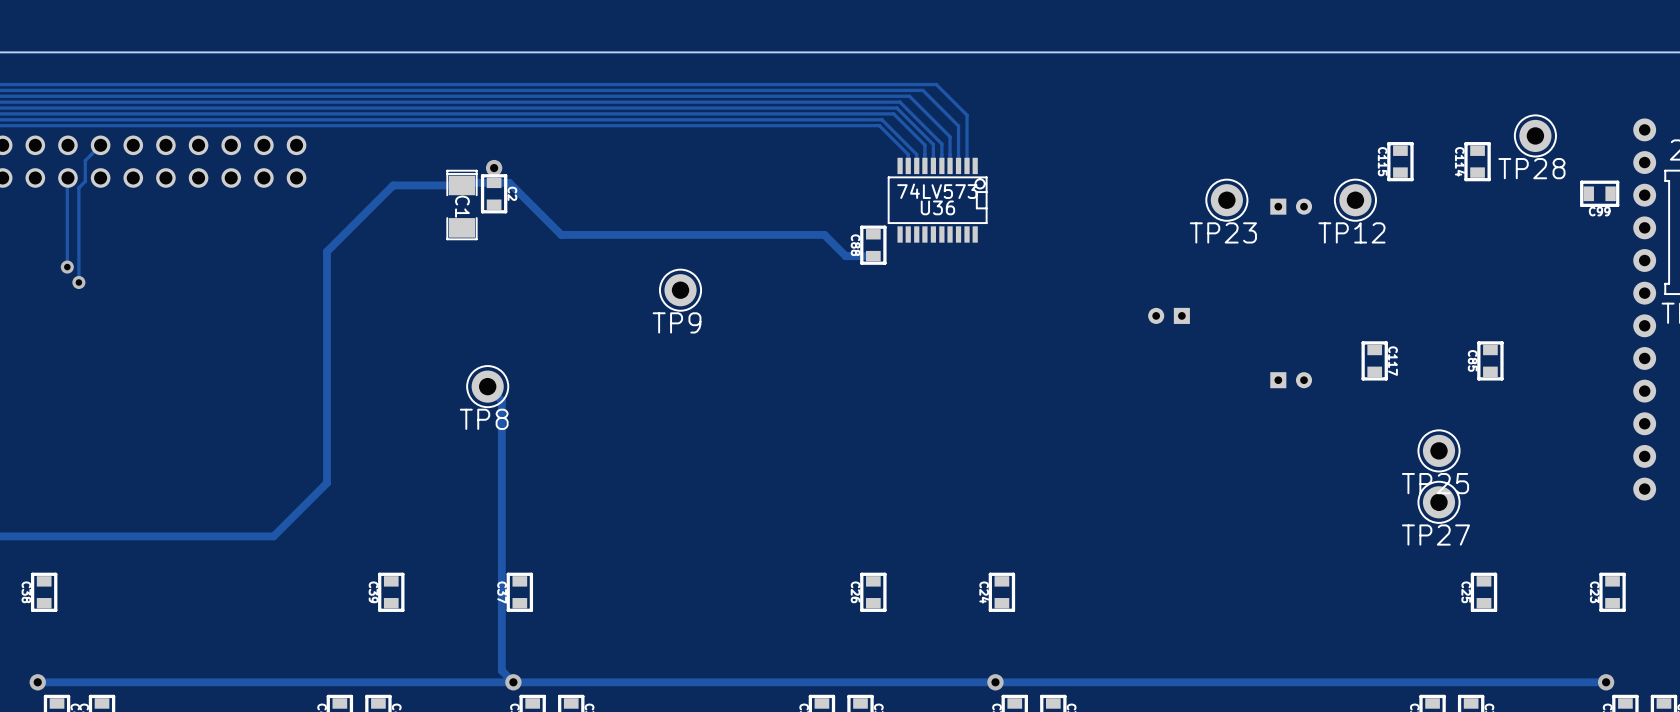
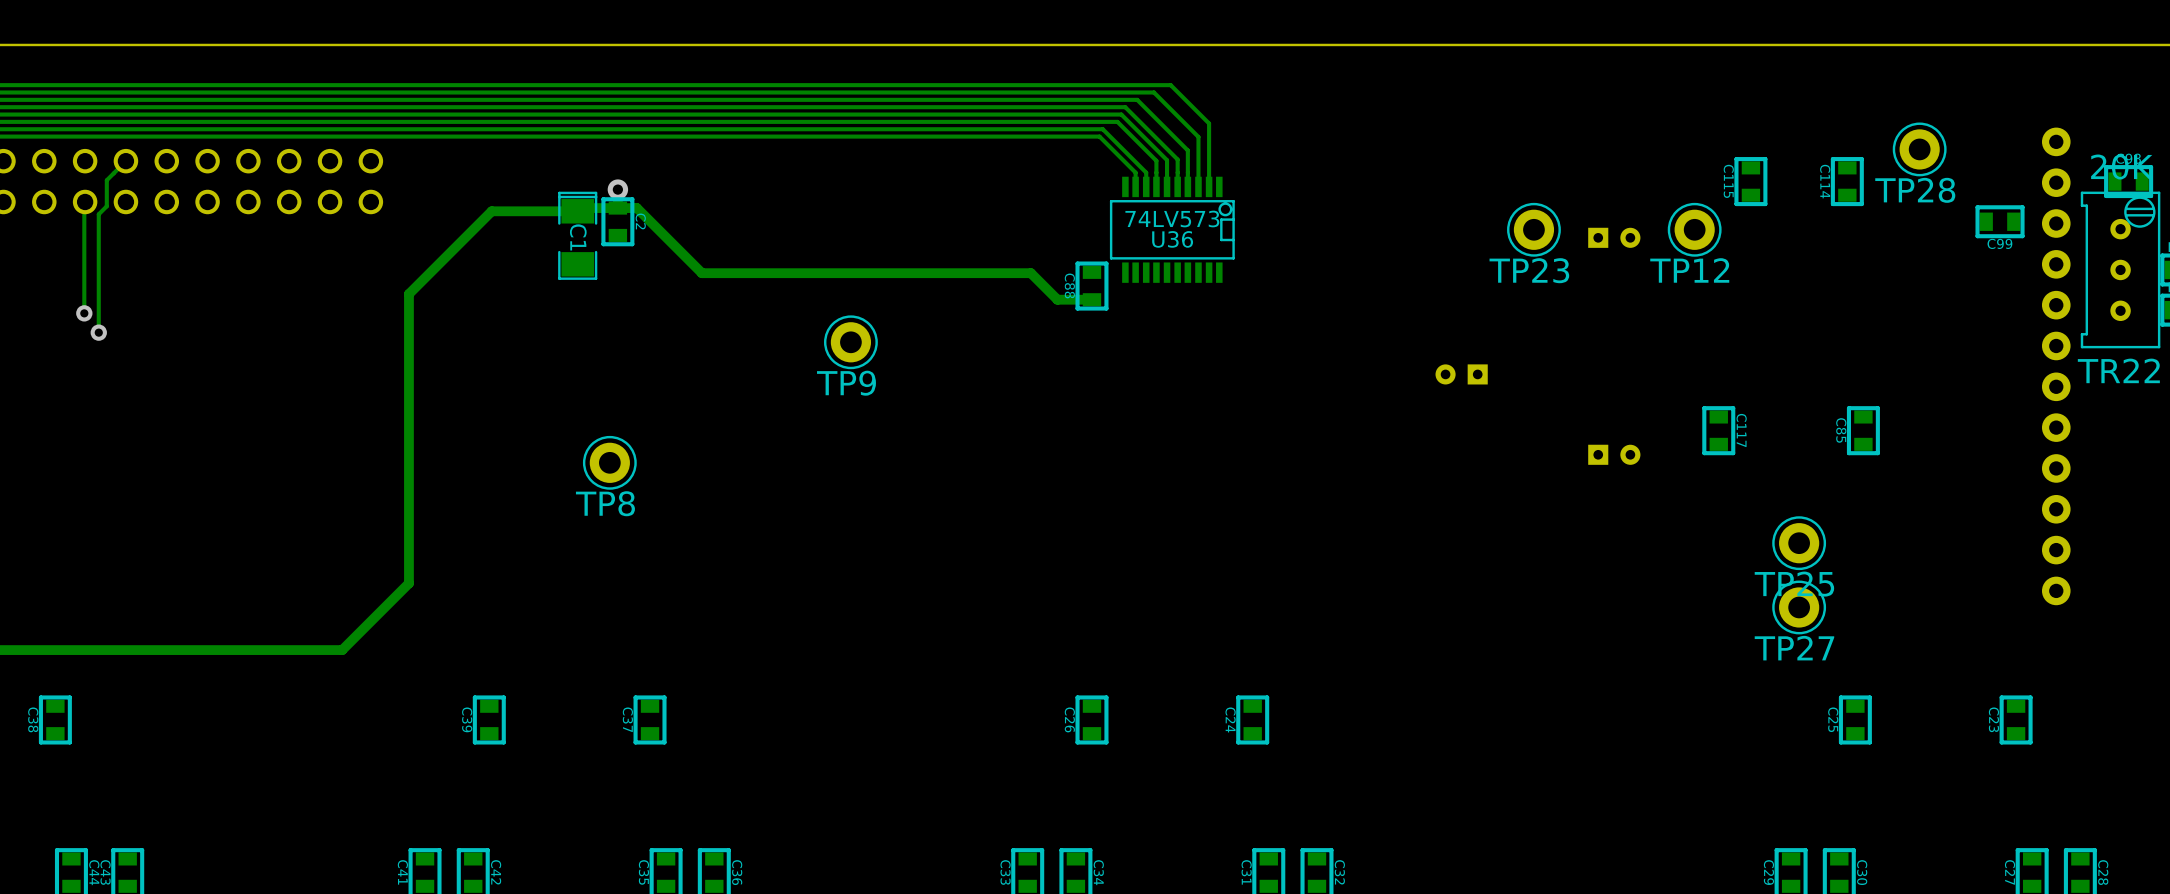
track: (487, 386) (501, 400) (501, 670) (513, 682) -> none
via: (37, 682) -> none
via: (513, 682) -> none
via: (995, 682) -> none
track: (1606, 682) (37, 682) -> none
via: (1606, 682) -> none

